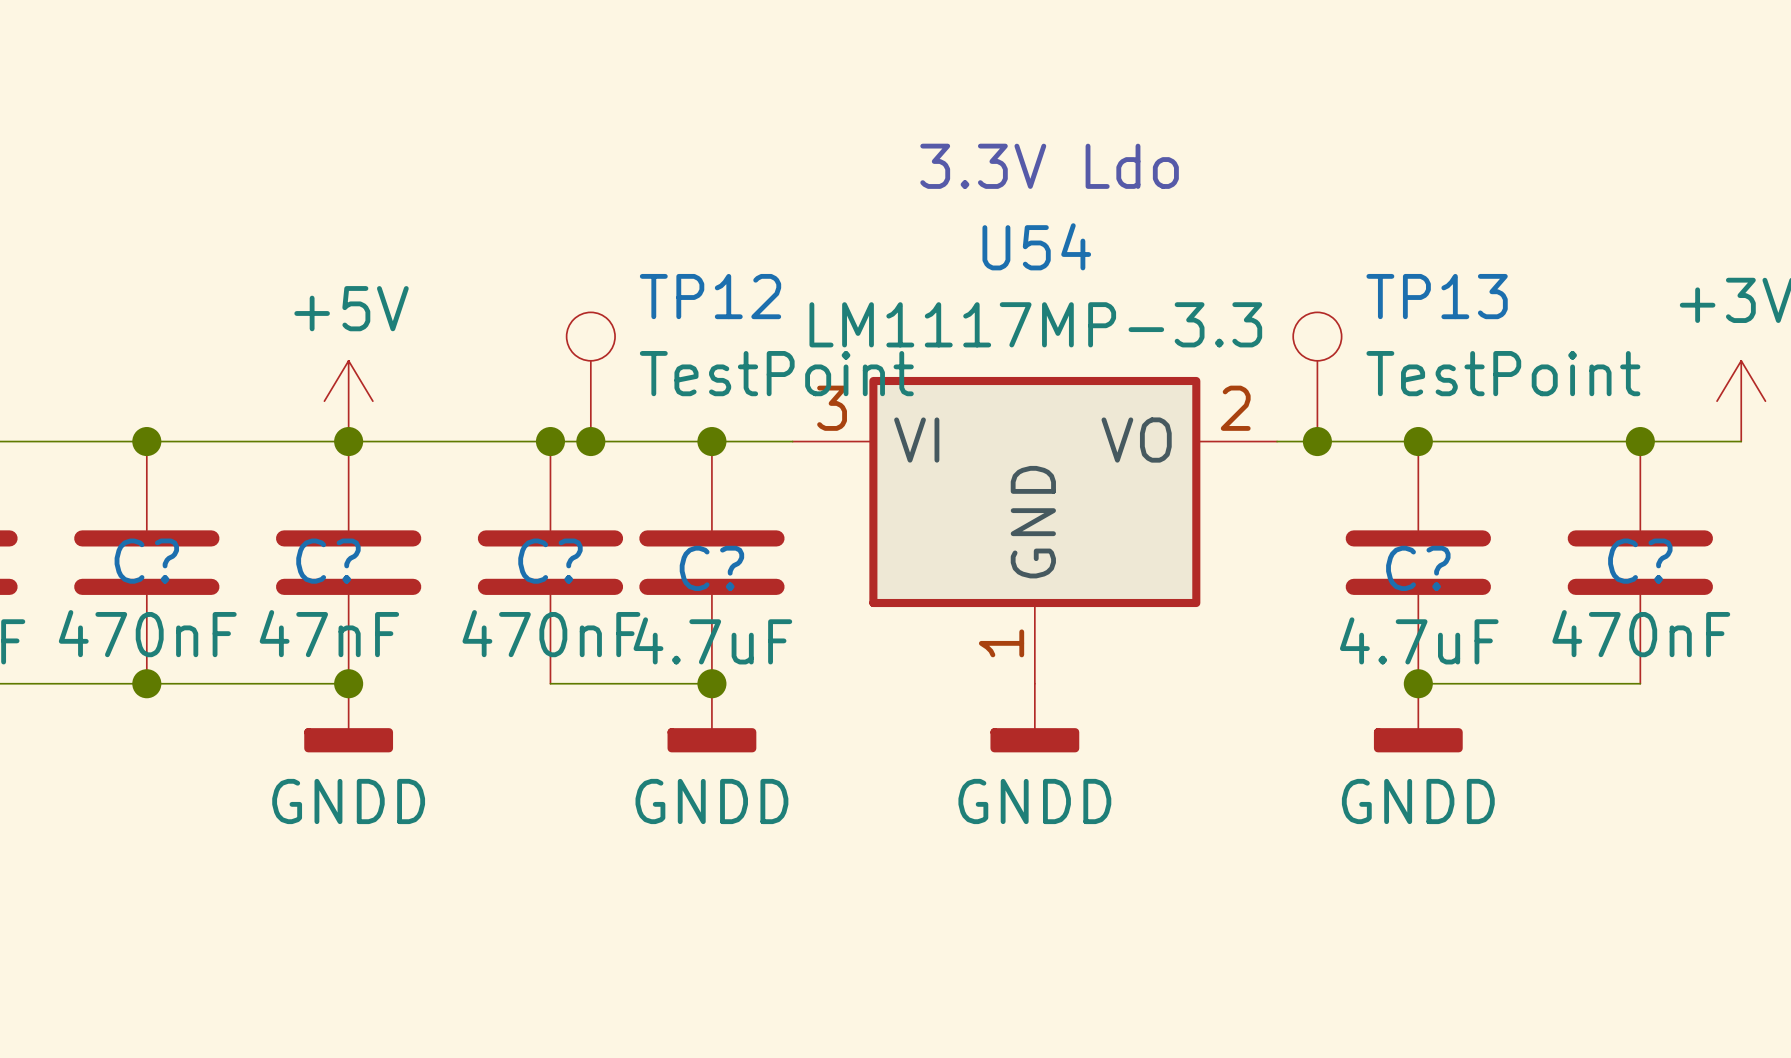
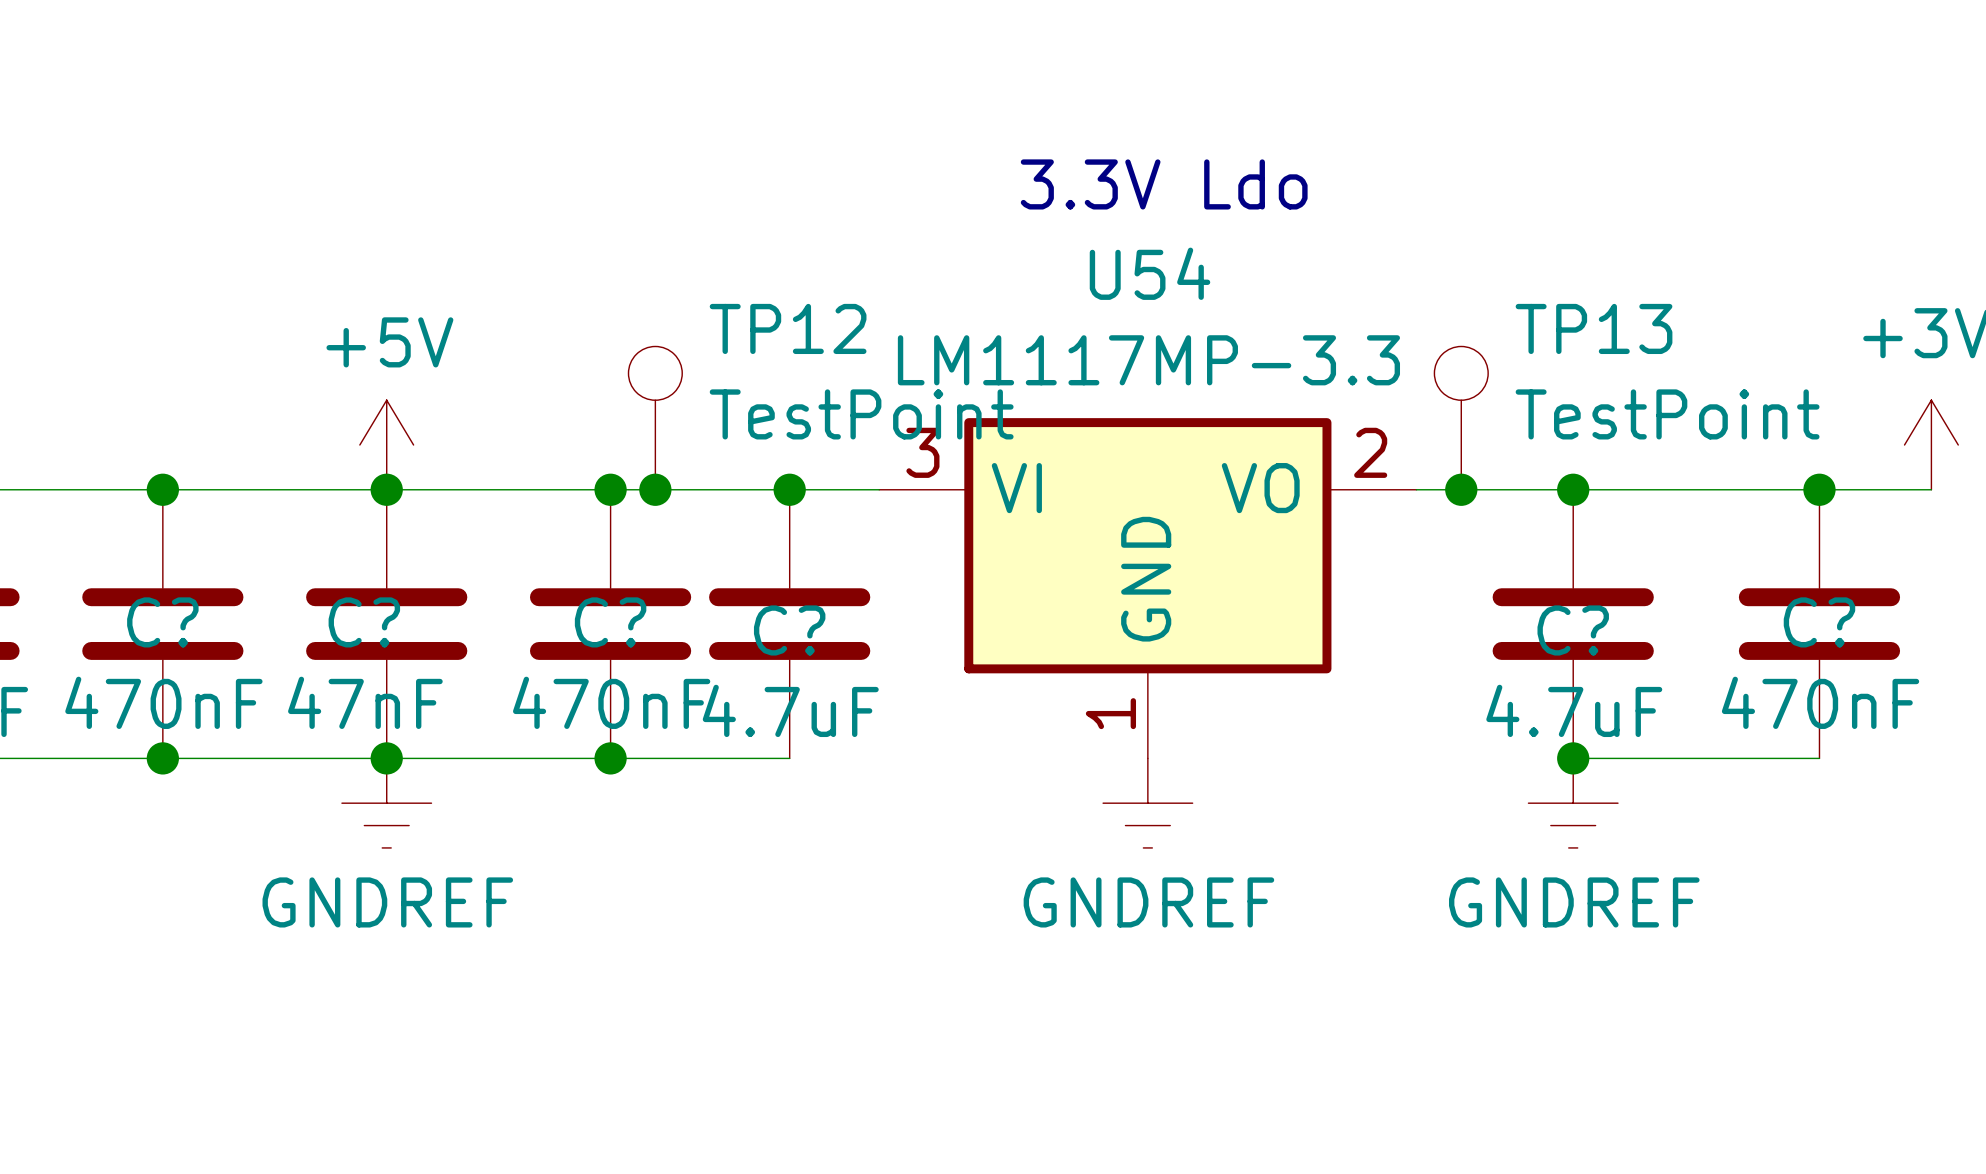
wire: none -> (386, 758) (610, 758)
junction position: (711, 683) -> (610, 758)
power symbol: GNDD (348, 718) -> GNDREF (386, 803)
power symbol: GNDD (711, 718) -> none
power symbol: GNDD (1034, 718) -> GNDREF (1147, 803)
power symbol: GNDD (1418, 718) -> GNDREF (1573, 803)

